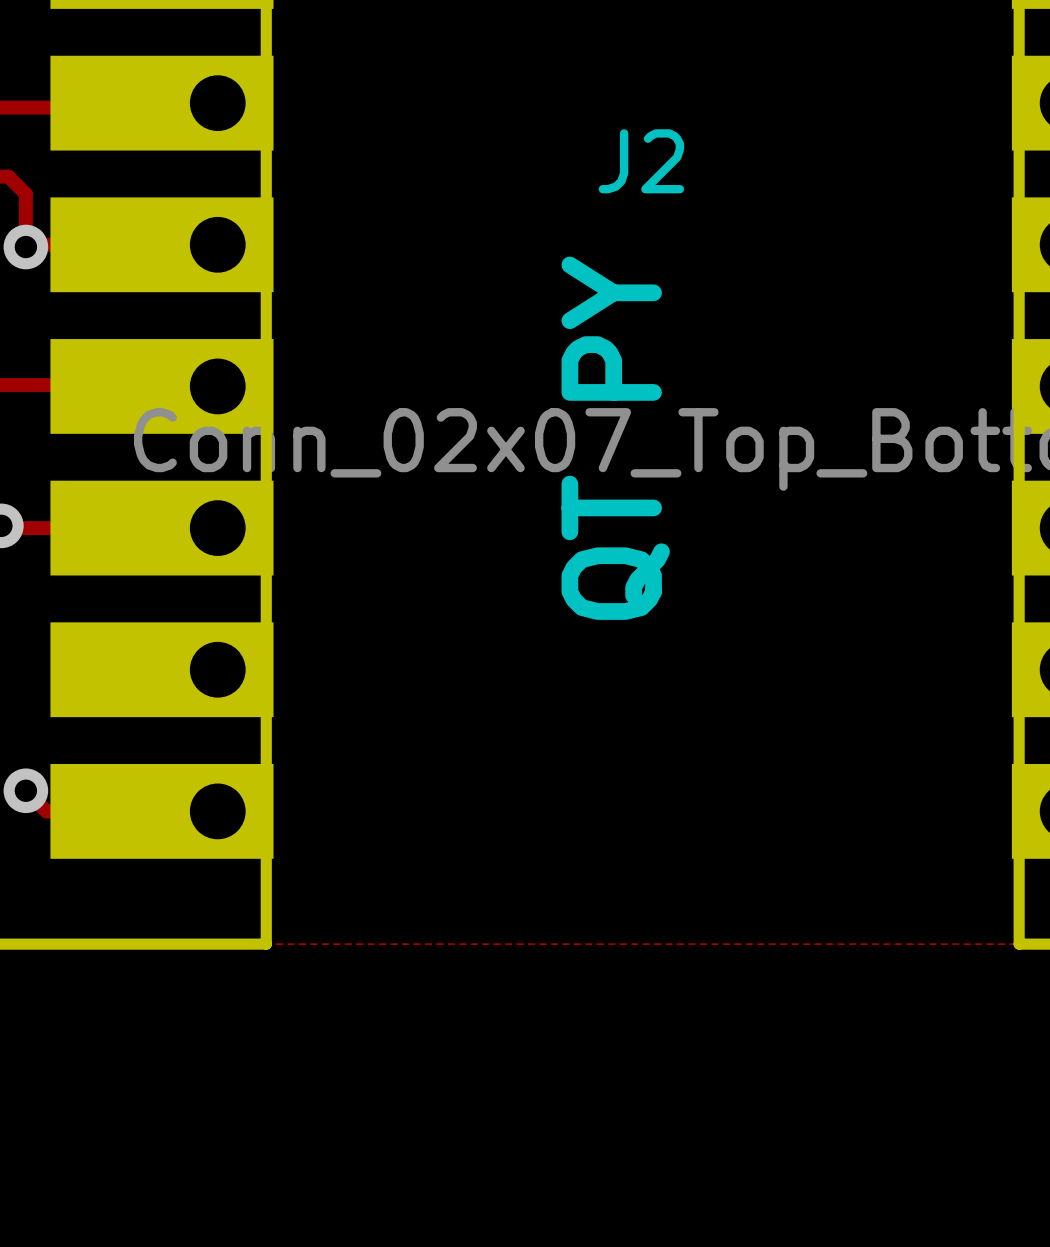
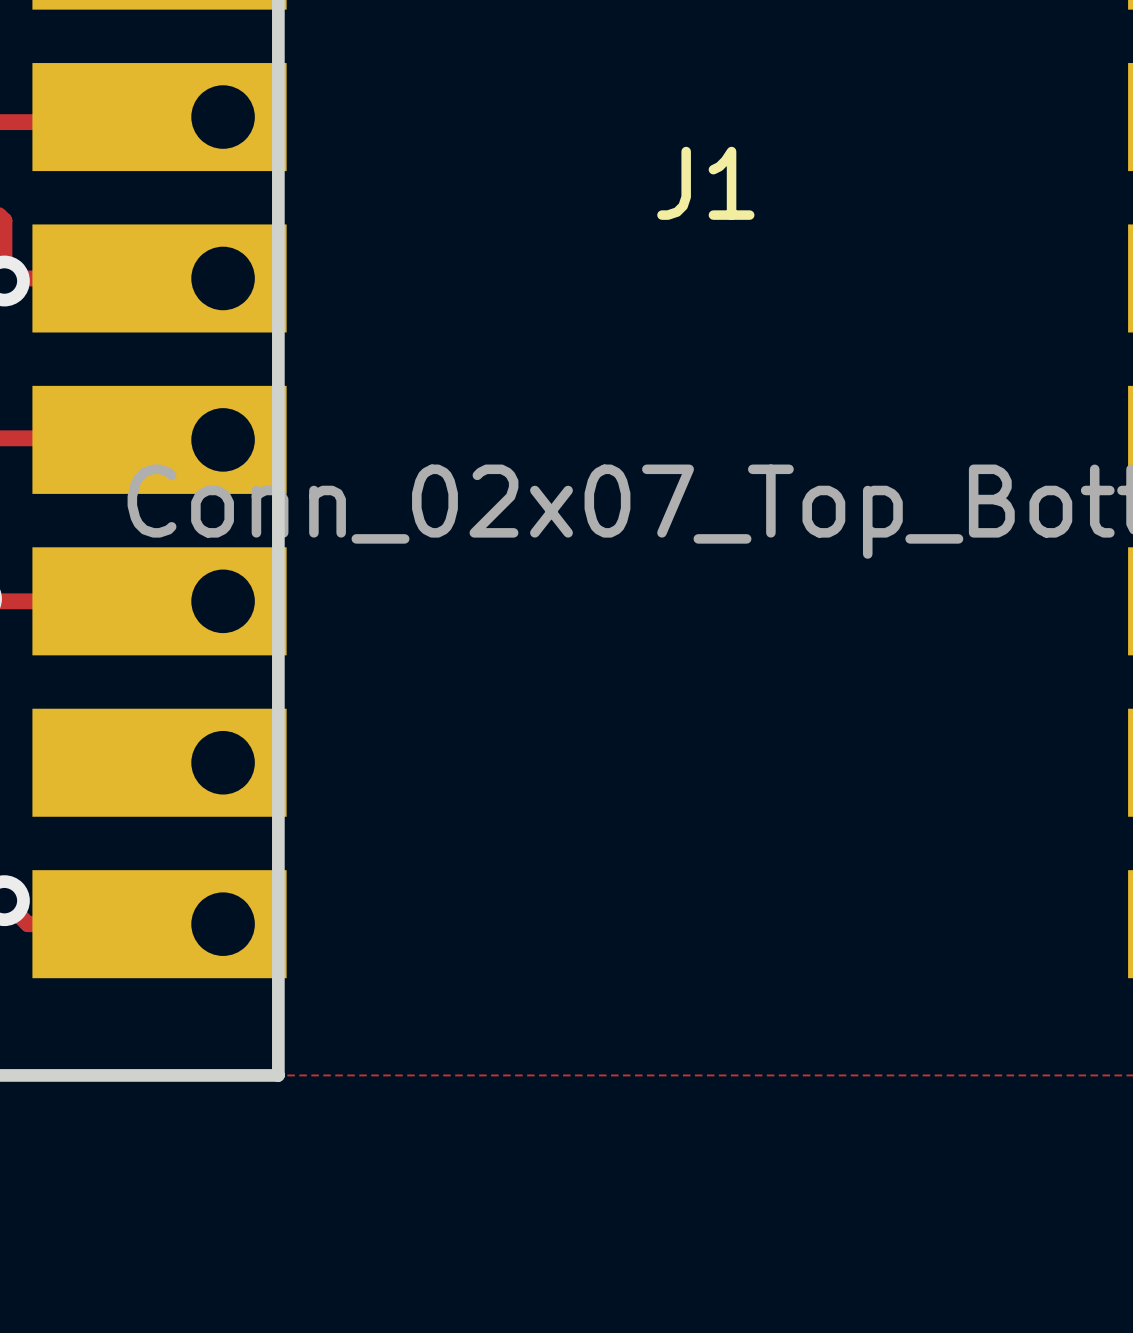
J2 name: J2 (641, 161) -> J1 (705, 183)
text: QT PY (615, 438) -> none

